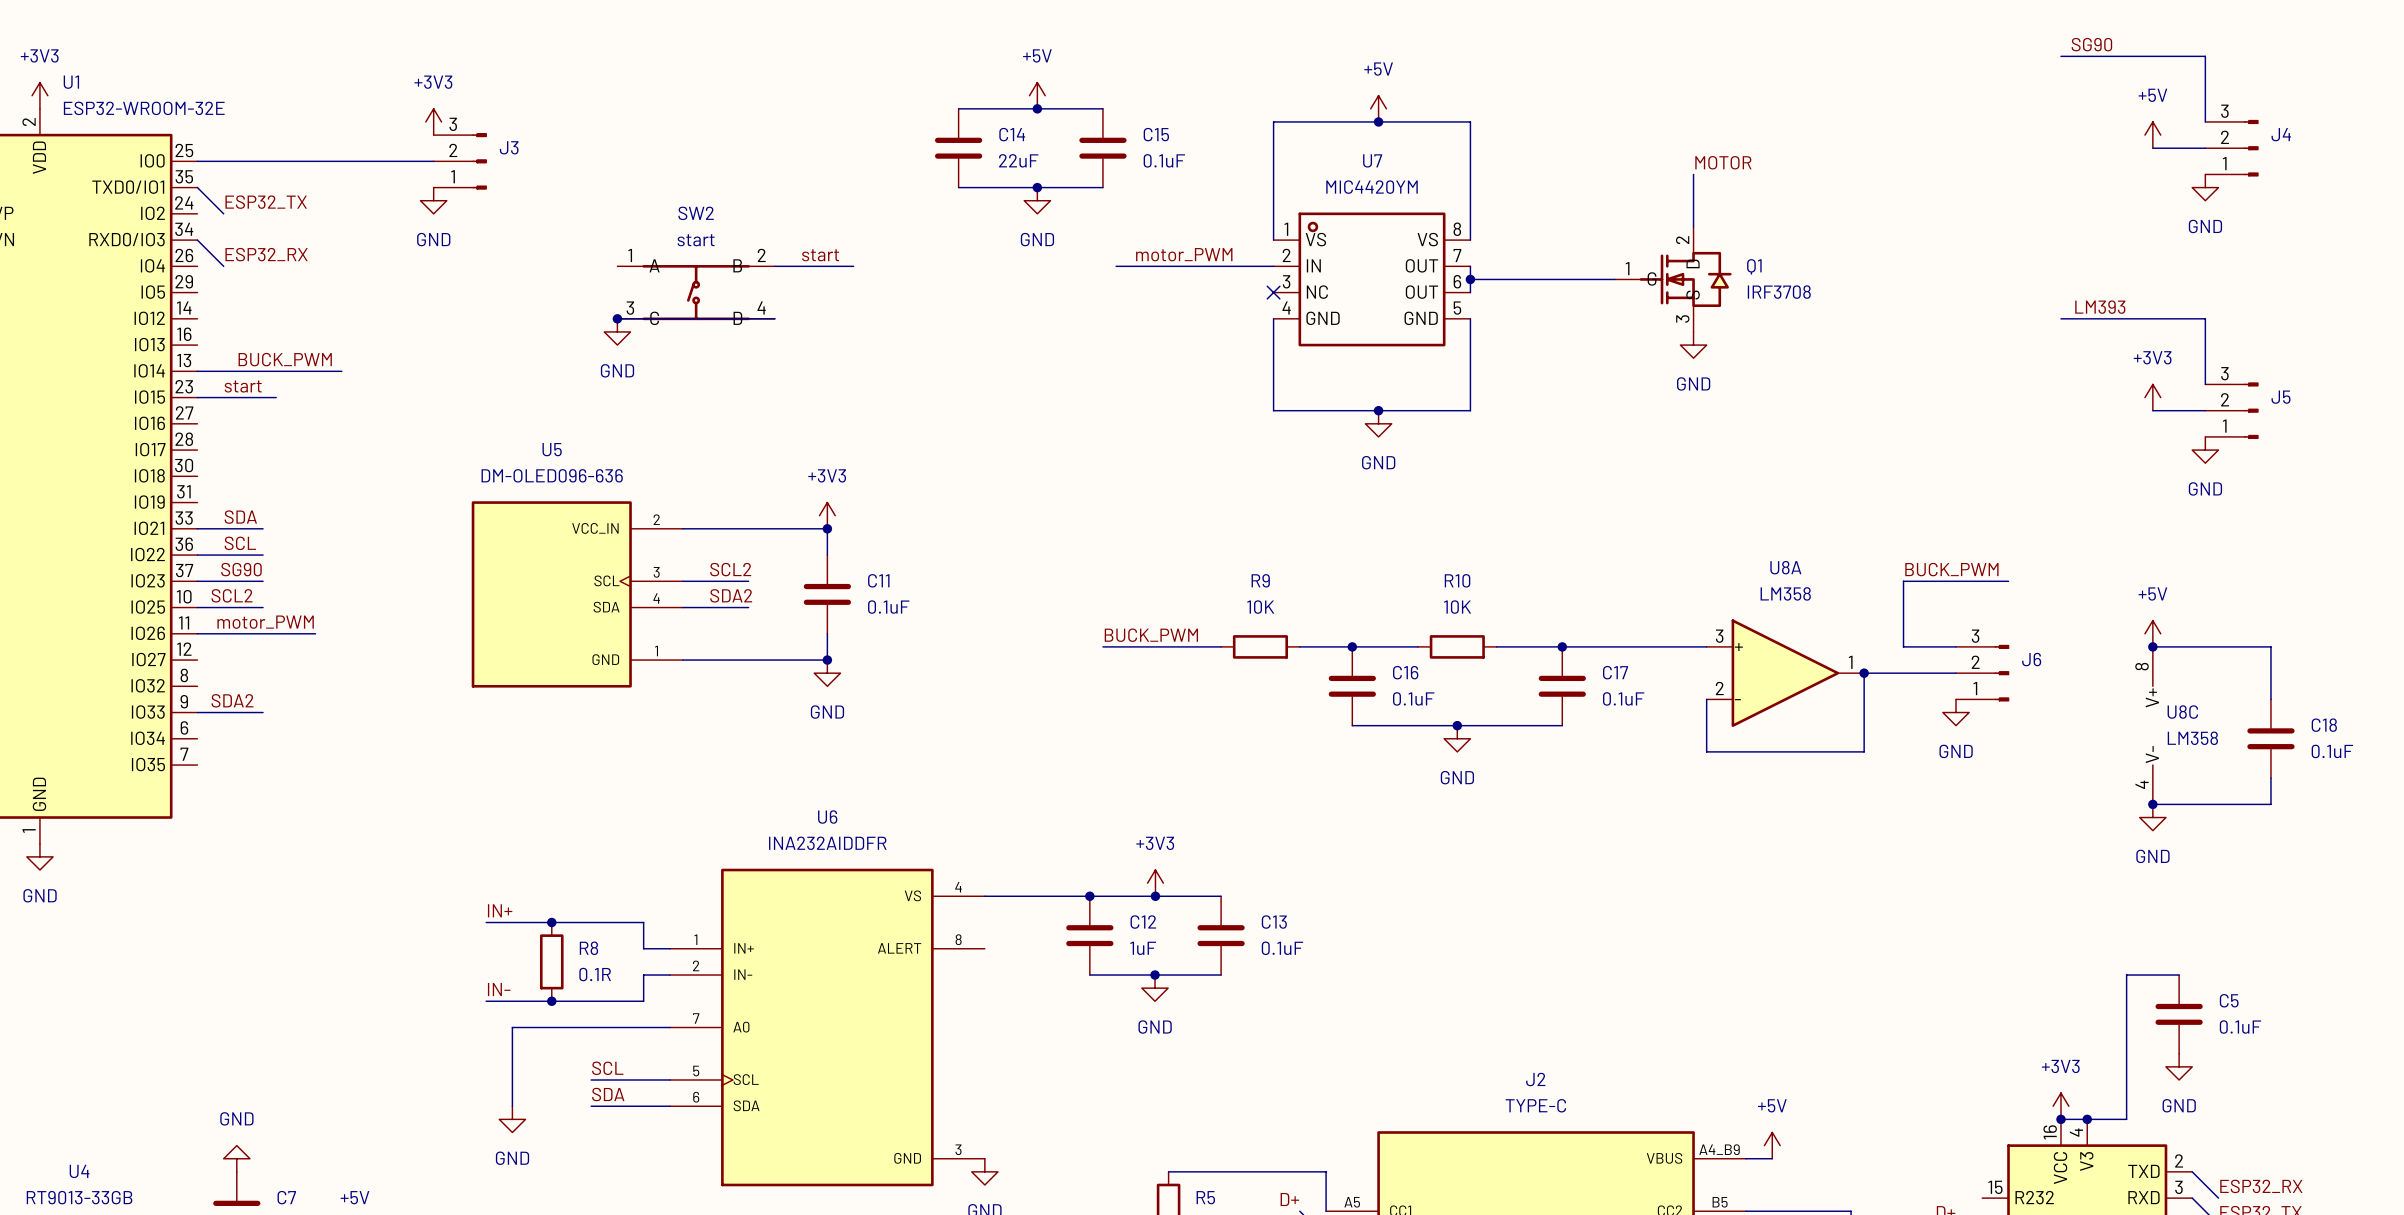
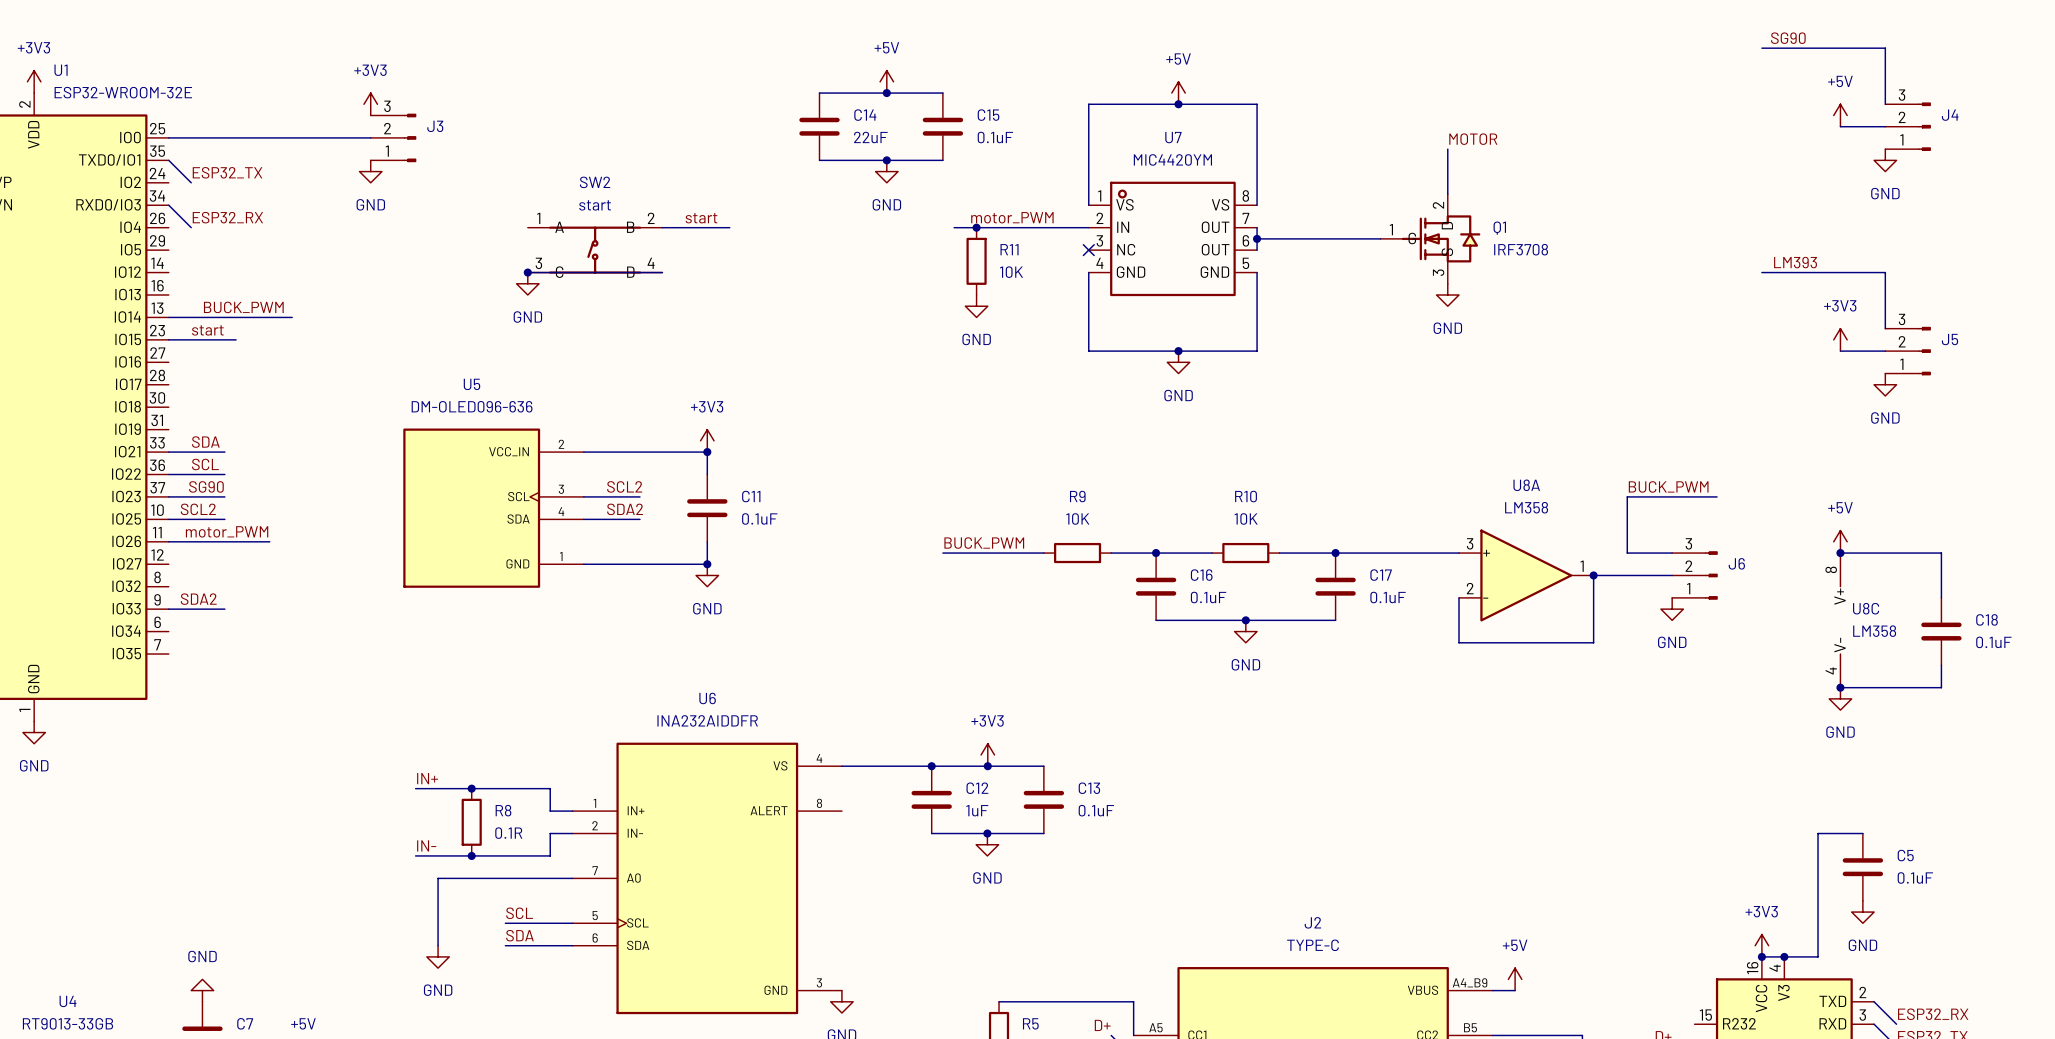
junction: none -> (976, 227)
R11: none -> 10K (976, 261)
power symbol: none -> GND (976, 306)

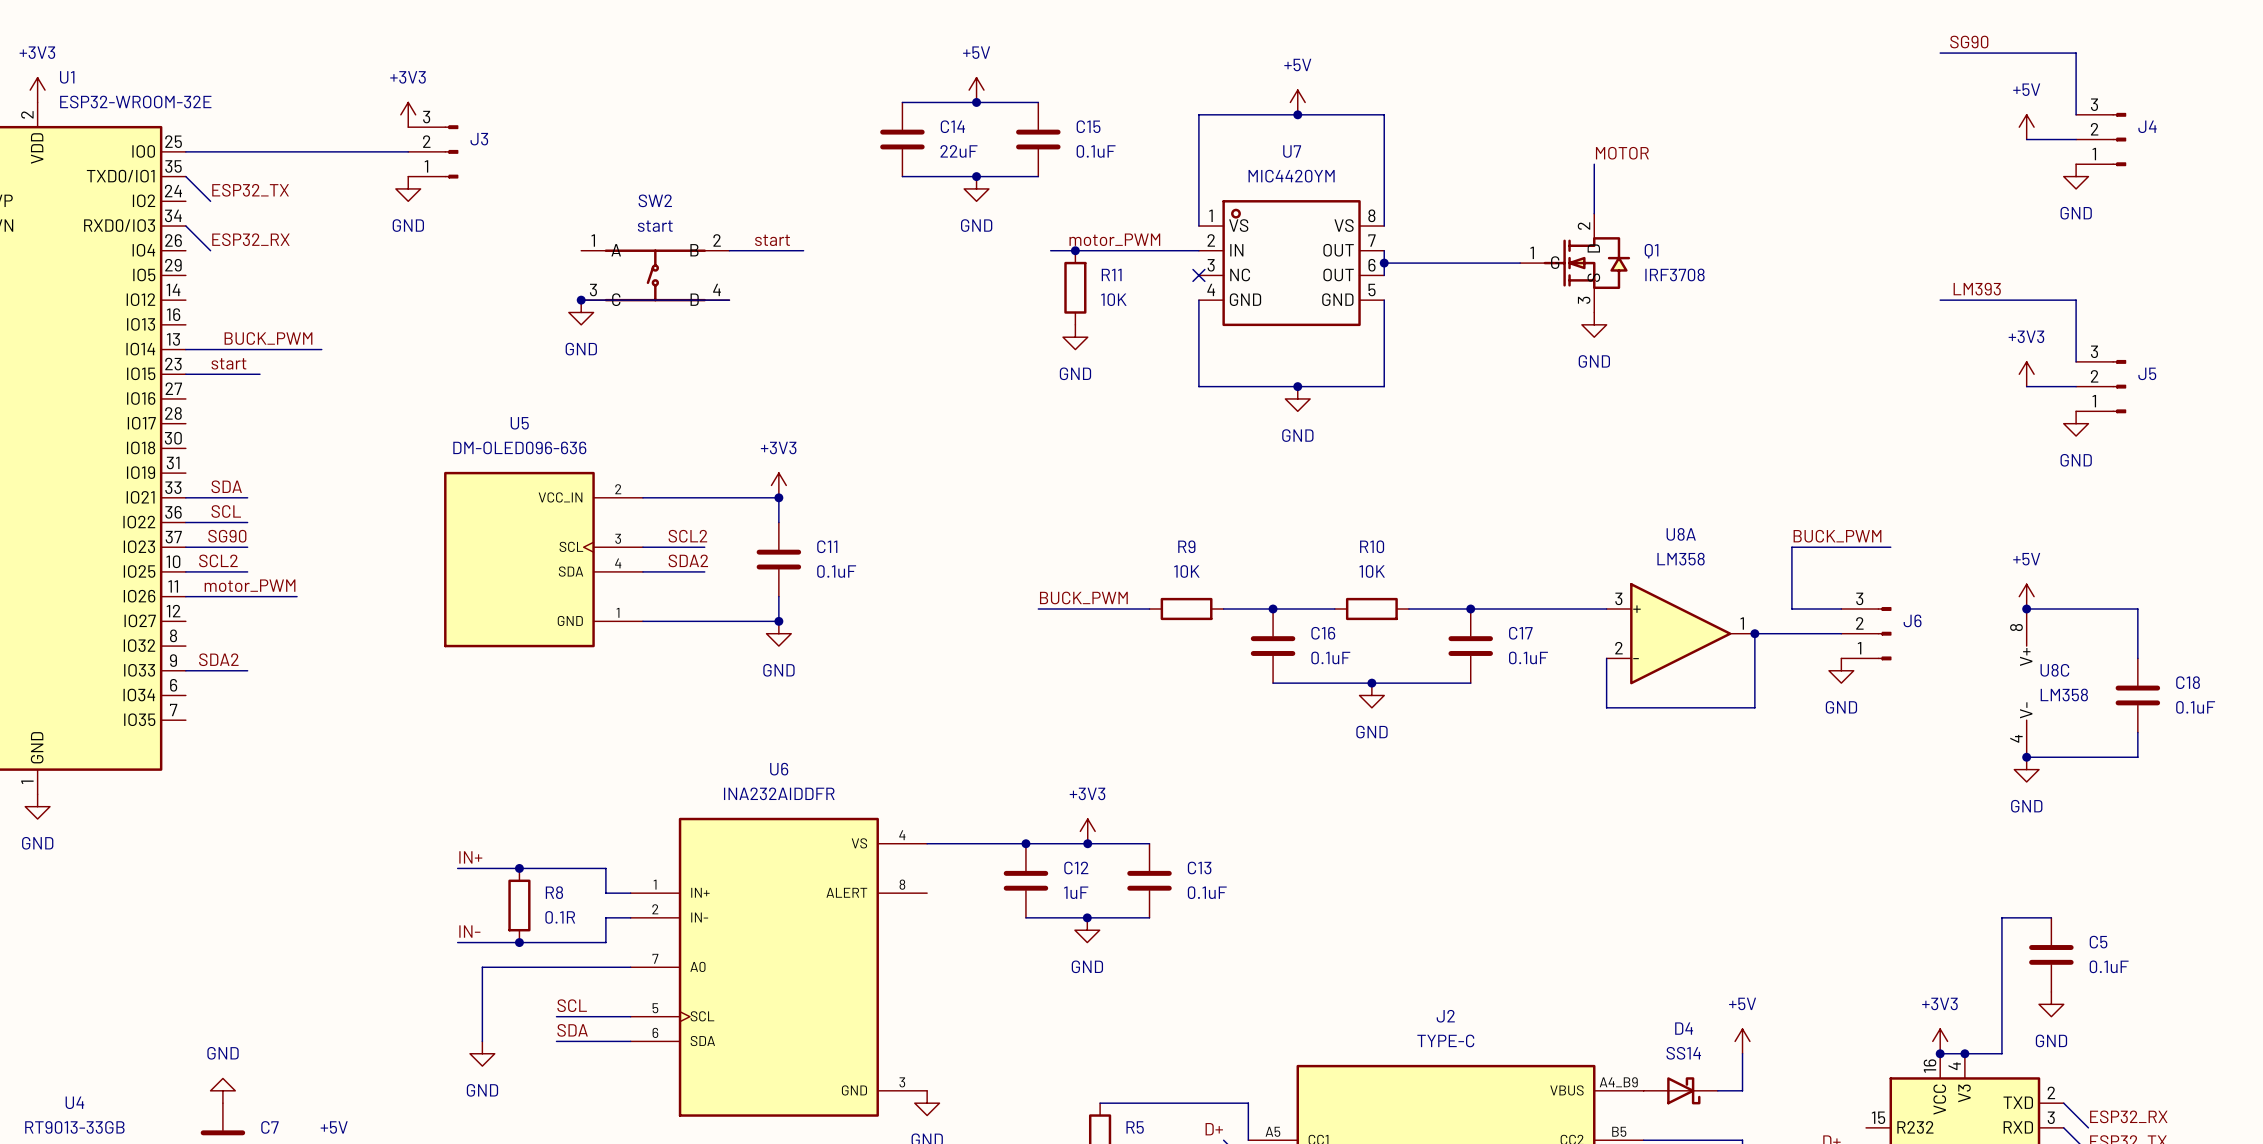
wire: none -> (1742, 1053) (1742, 1090) (1717, 1090)
power symbol position: +5V (1515, 979) -> +5V (1742, 1041)
D4: none -> SS14 (1680, 1090)

